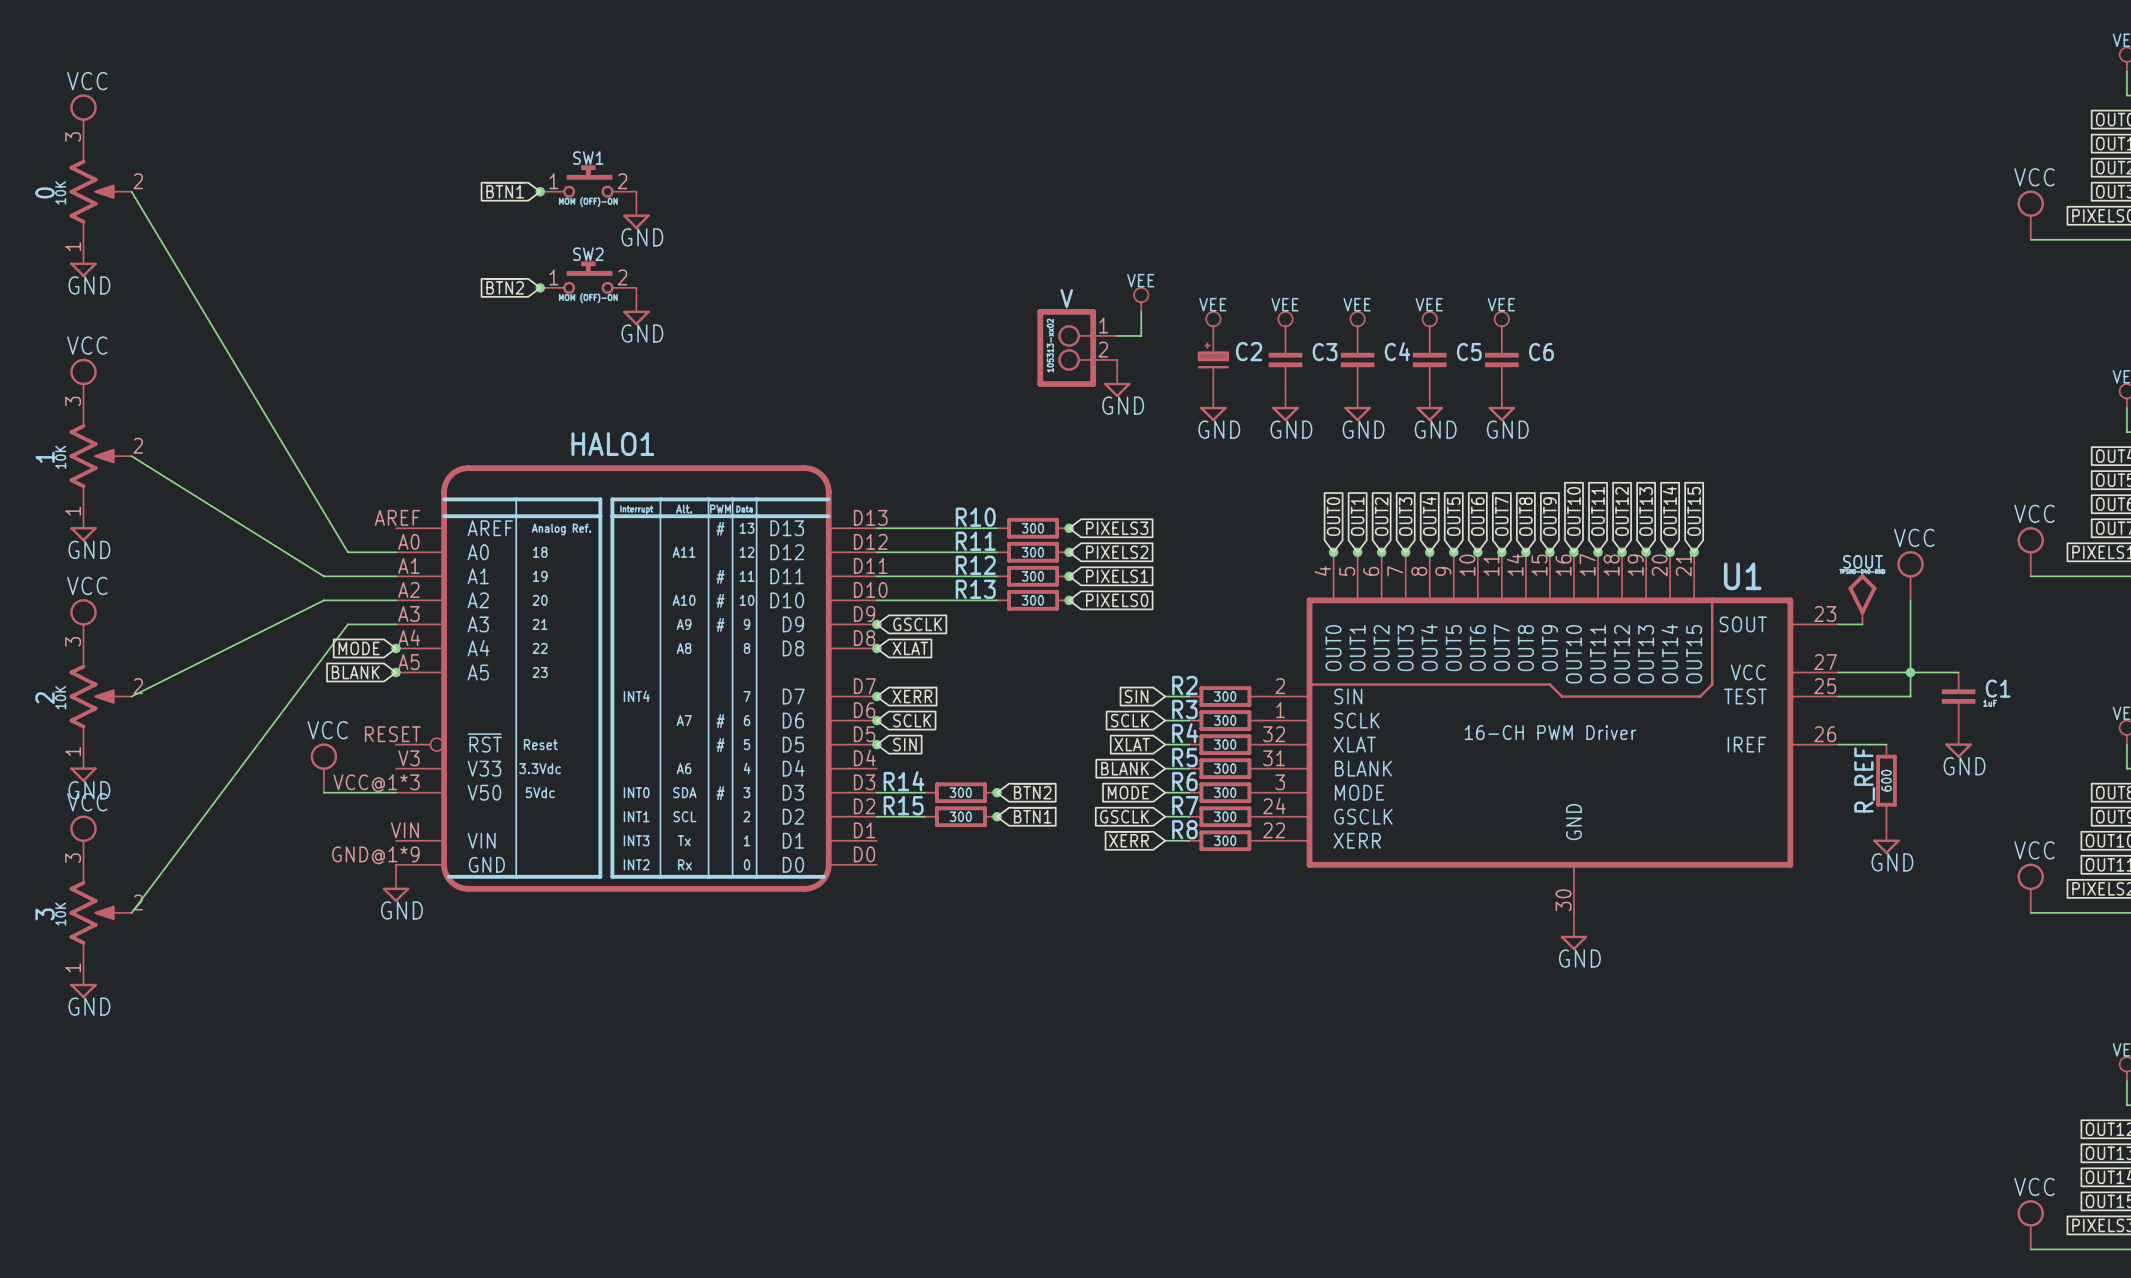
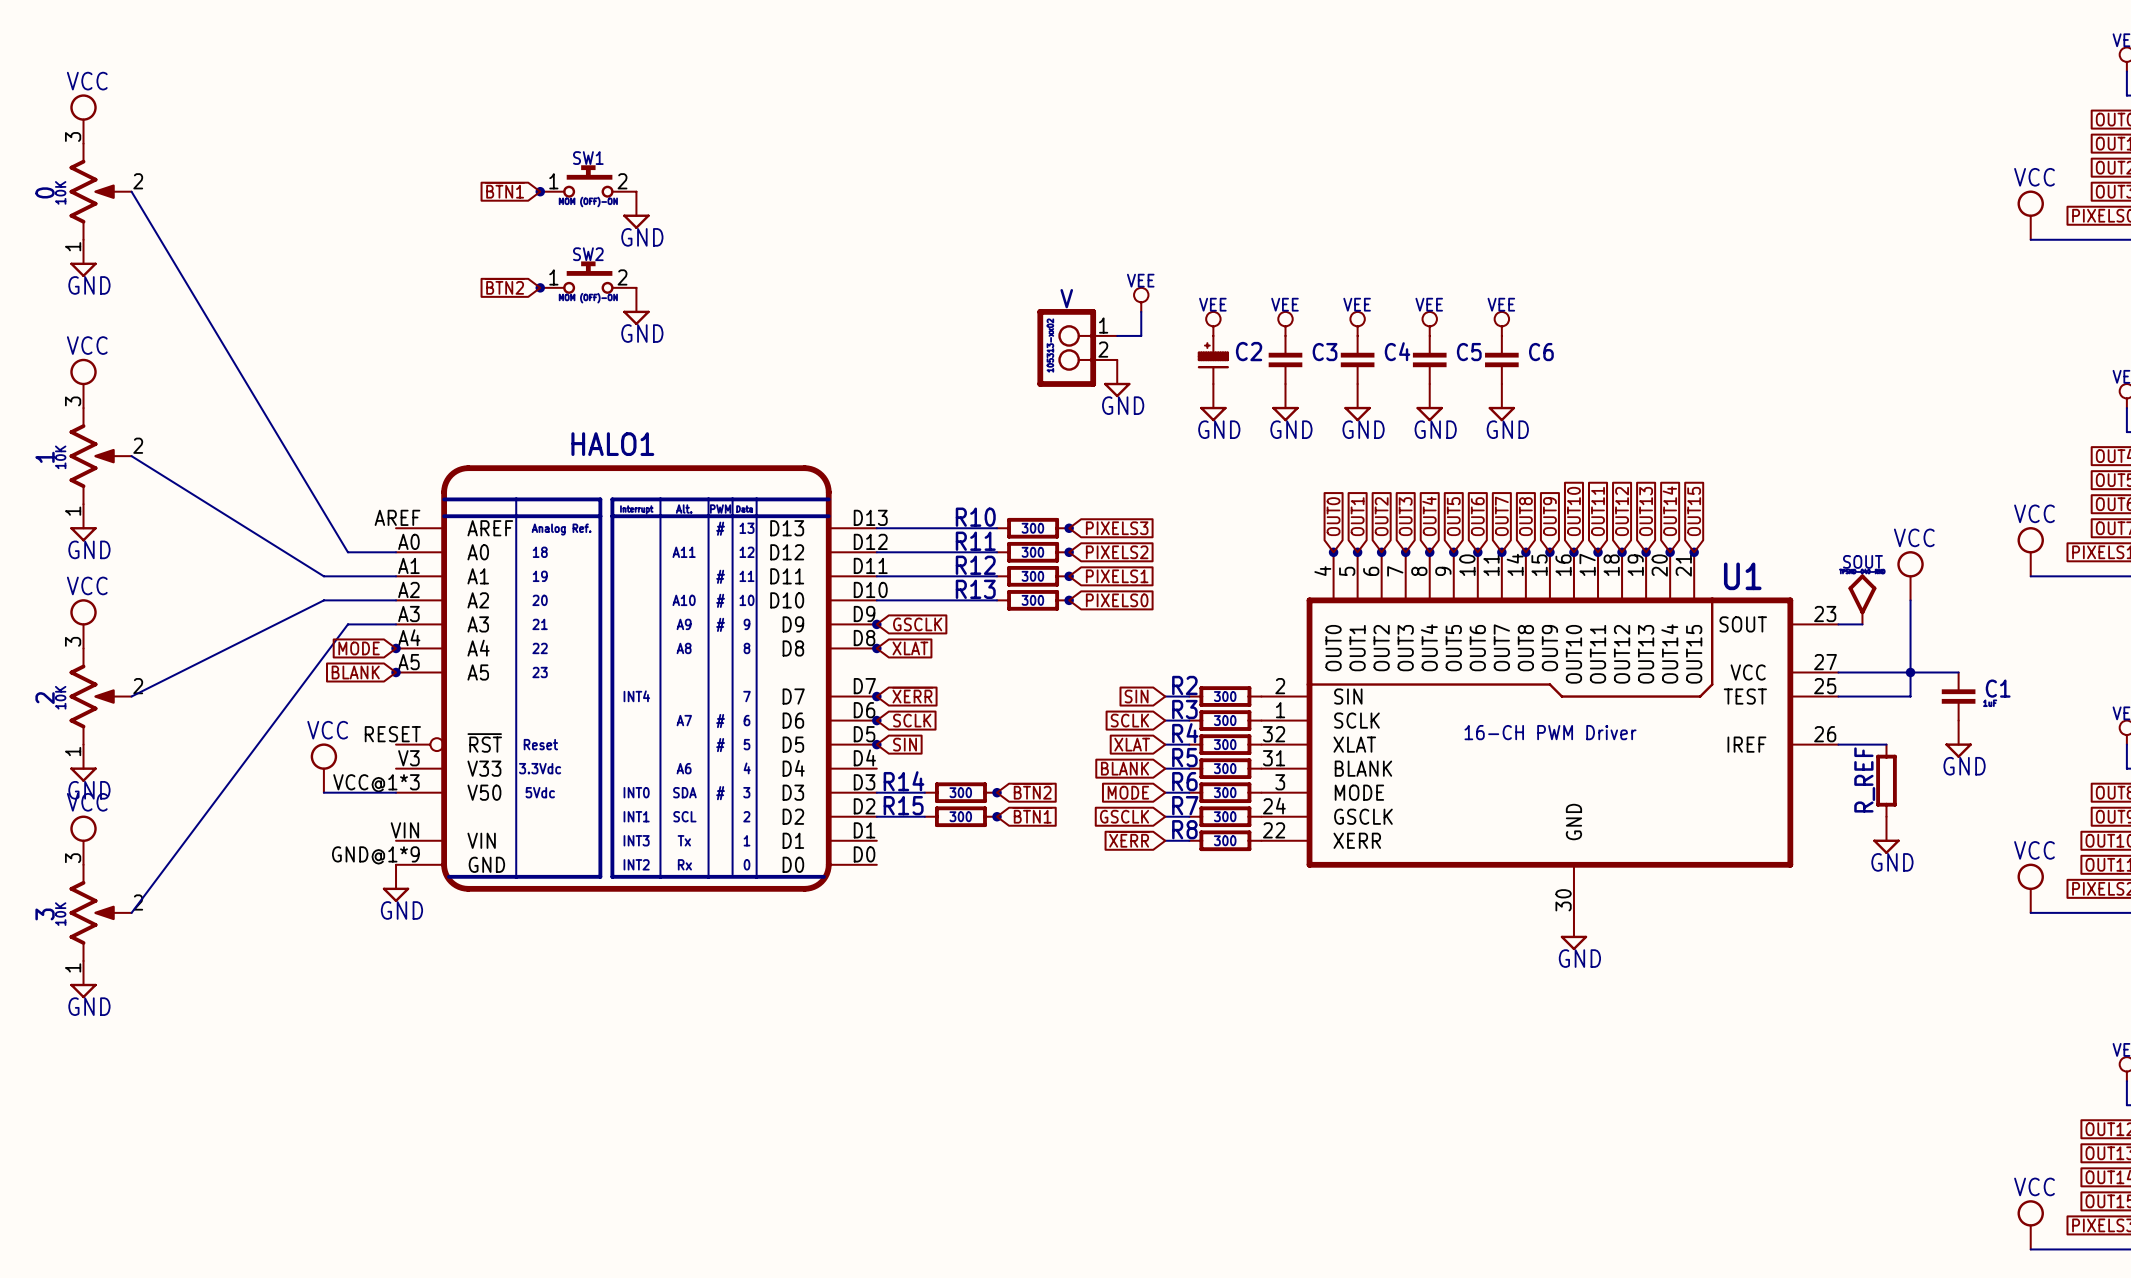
R_REF value: 600 (1886, 780) -> none

